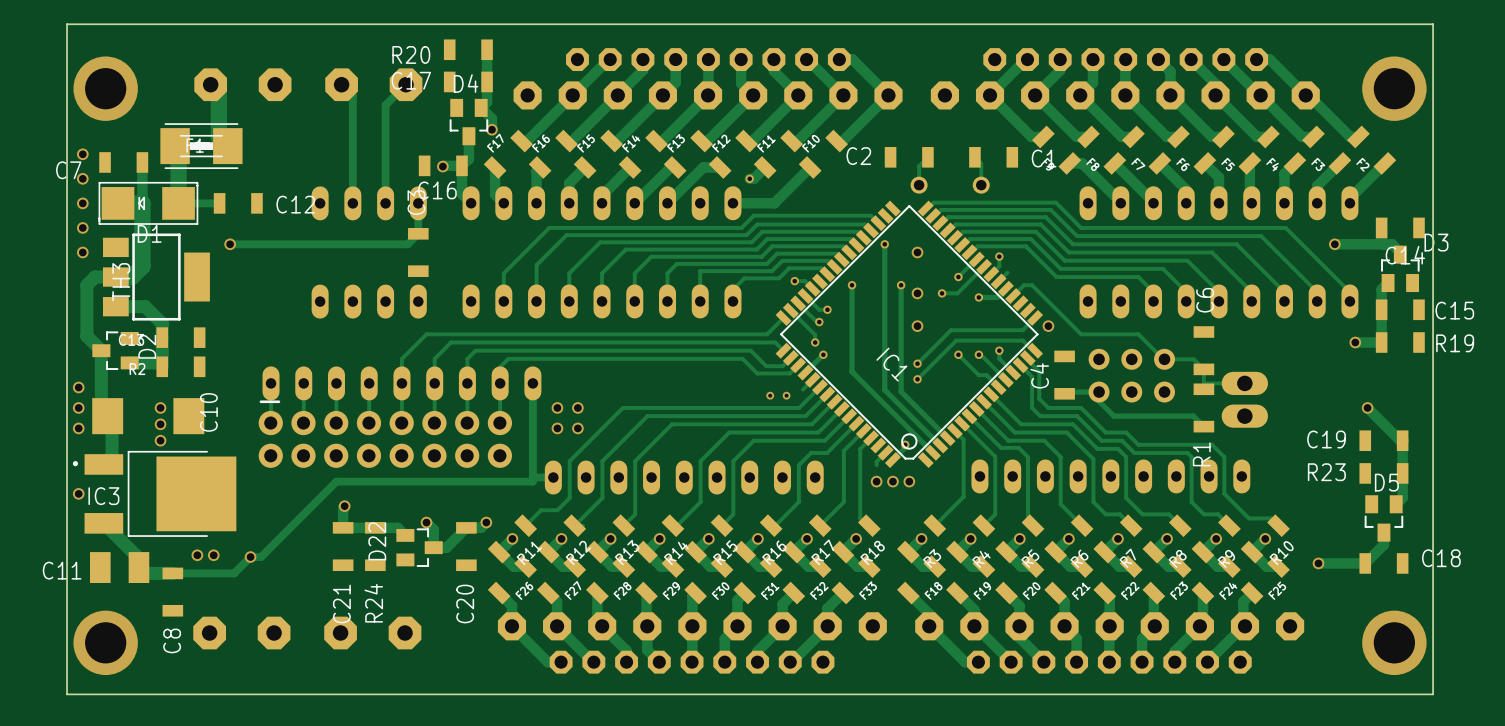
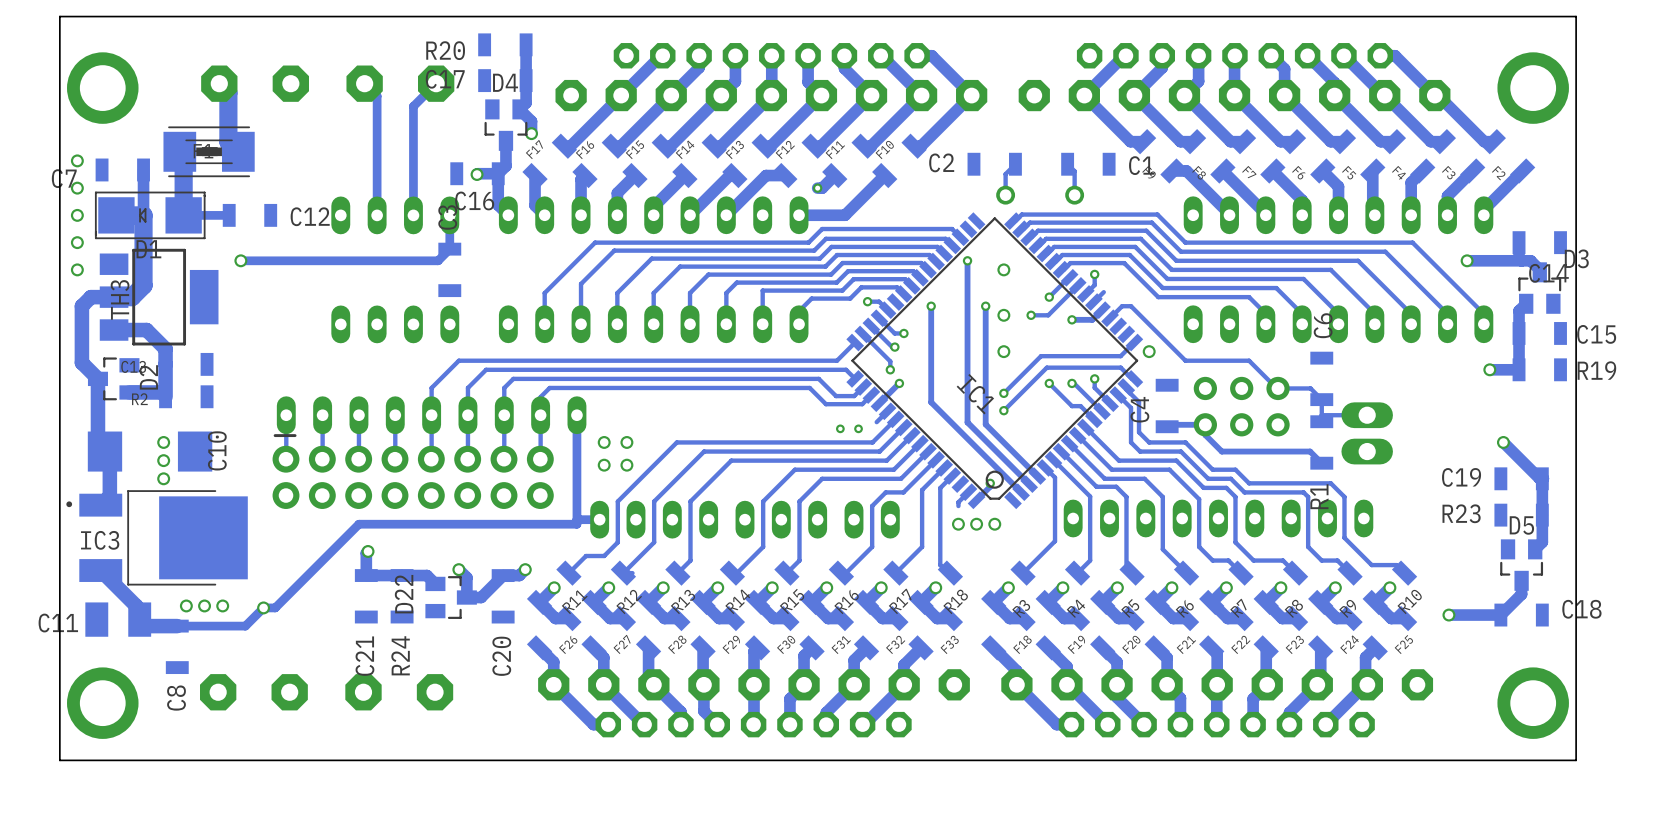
via: (78, 387) -> none
via: (78, 407) -> none
via: (78, 428) -> none
via: (78, 493) -> none
via: none -> (186, 605)

